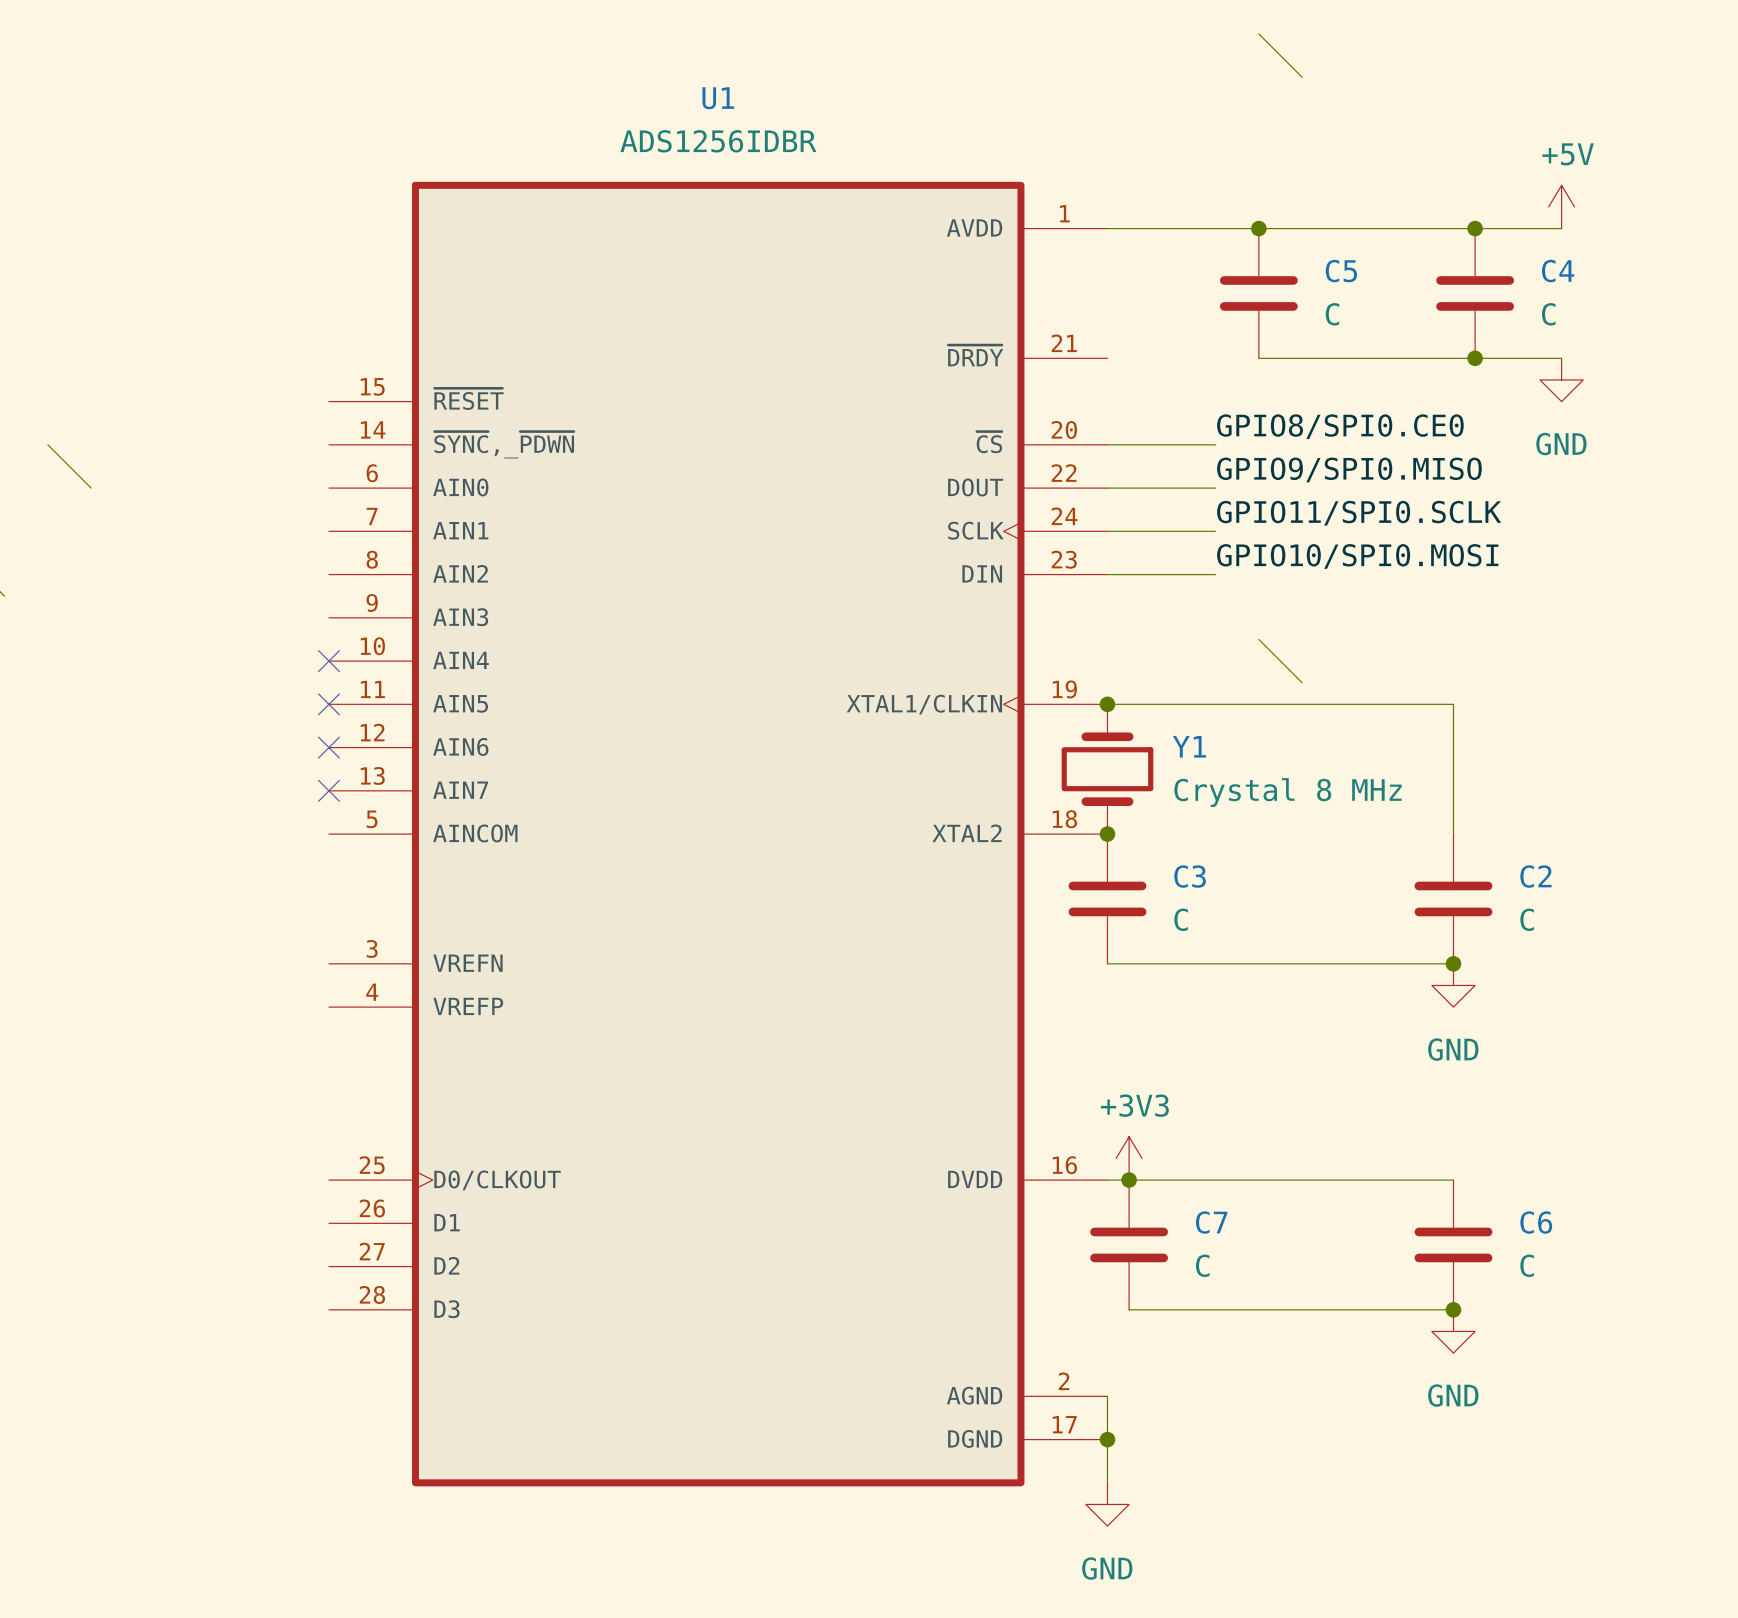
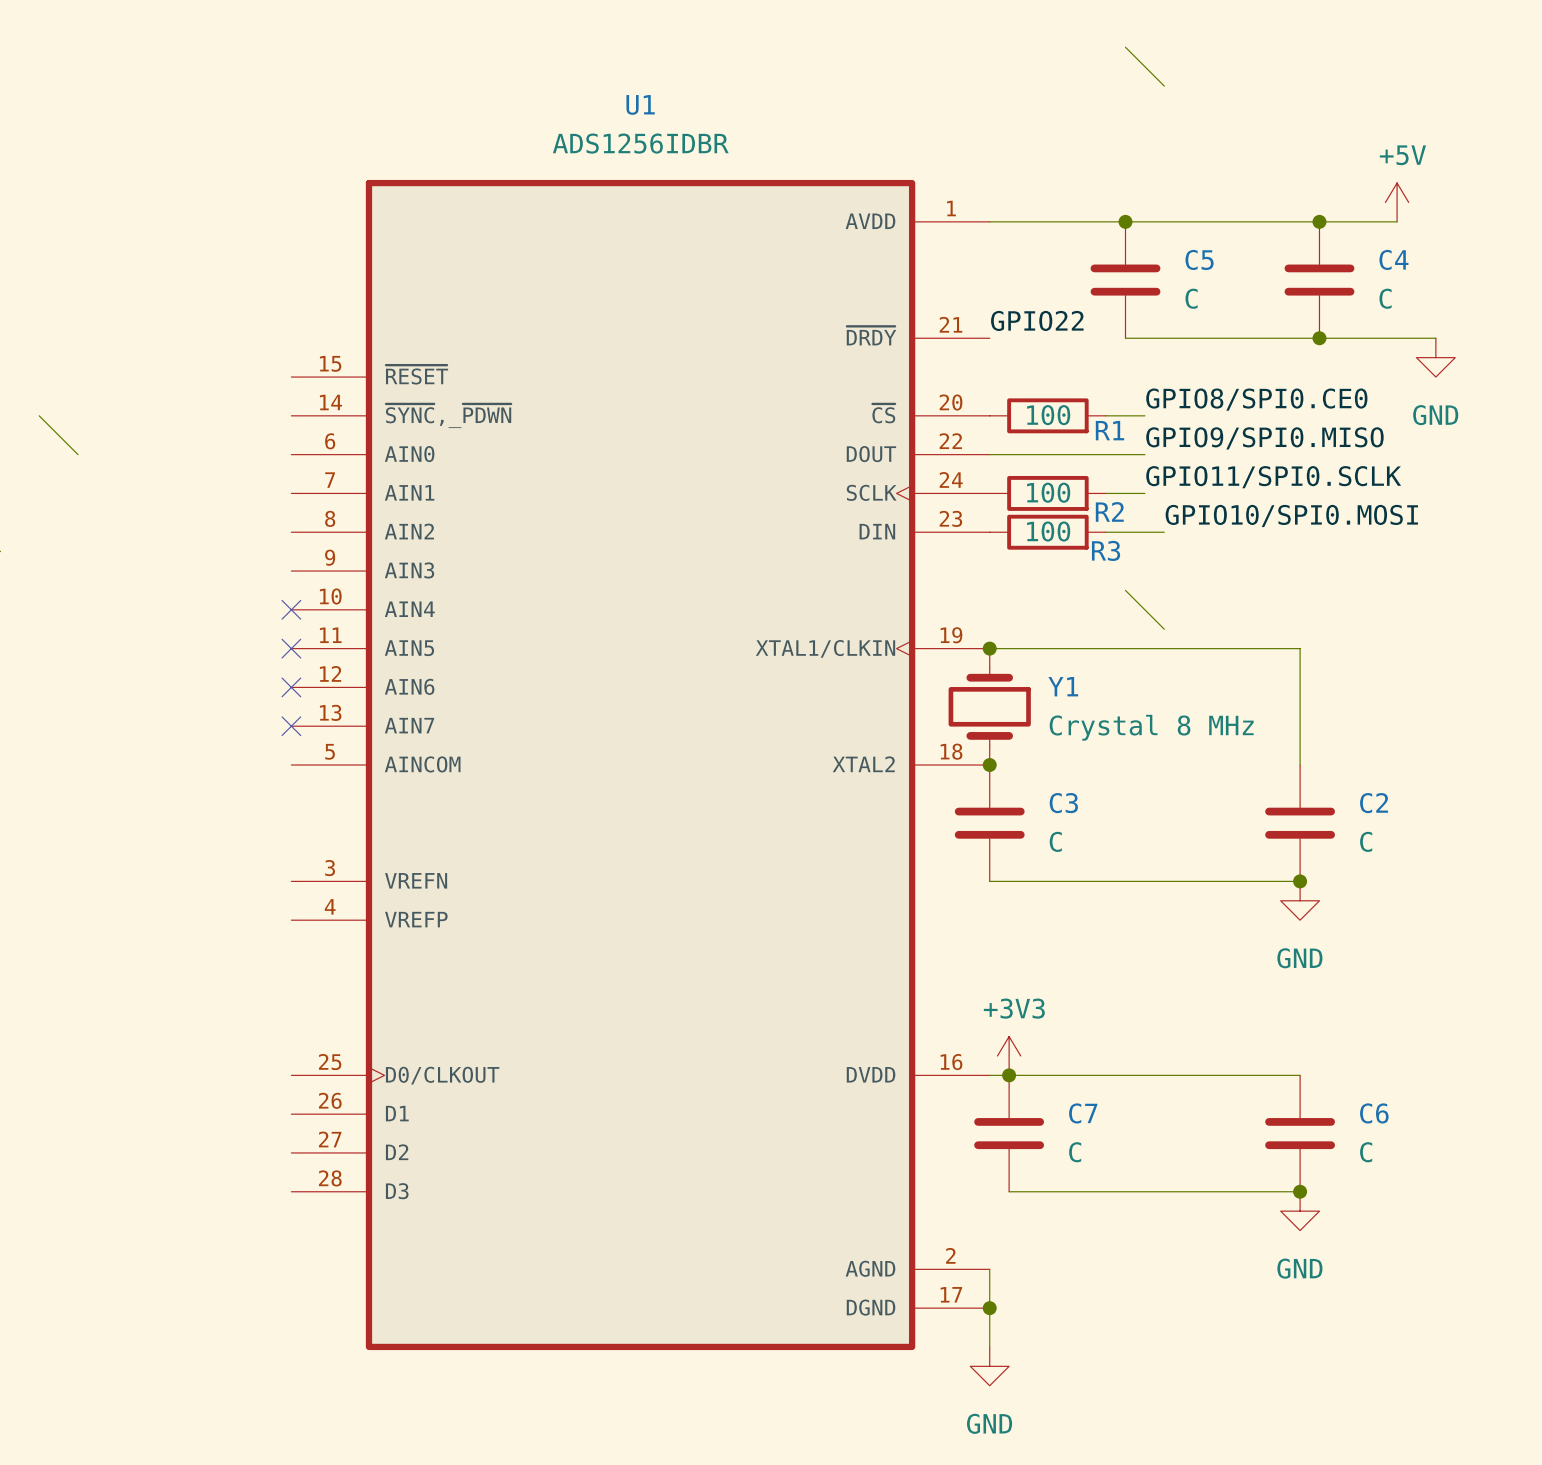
label: none -> GPIO22 (1037, 320)
wire: none -> (1397, 338) (1435, 338)
power symbol position: GND (1561, 379) -> GND (1435, 357)
label position: GPIO8/SPI0.CE0 (1340, 426) -> GPIO8/SPI0.CE0 (1256, 399)
wire: (1107, 444) (1215, 444) -> none
R1: none -> 100 (1047, 415)
wire: none -> (1106, 415) (1144, 415)
label position: GPIO9/SPI0.MISO (1349, 469) -> GPIO9/SPI0.MISO (1264, 438)
wire: none -> (1086, 454) (1144, 454)
label position: GPIO11/SPI0.SCLK (1359, 513) -> GPIO11/SPI0.SCLK (1273, 477)
wire: (1107, 531) (1215, 531) -> none
R2: none -> 100 (1047, 493)
wire: none -> (1106, 493) (1144, 493)
label position: GPIO10/SPI0.MOSI (1357, 556) -> GPIO10/SPI0.MOSI (1291, 515)
wire: (1107, 574) (1215, 574) -> none
R3: none -> 100 (1047, 532)
wire: none -> (1106, 532) (1164, 532)

